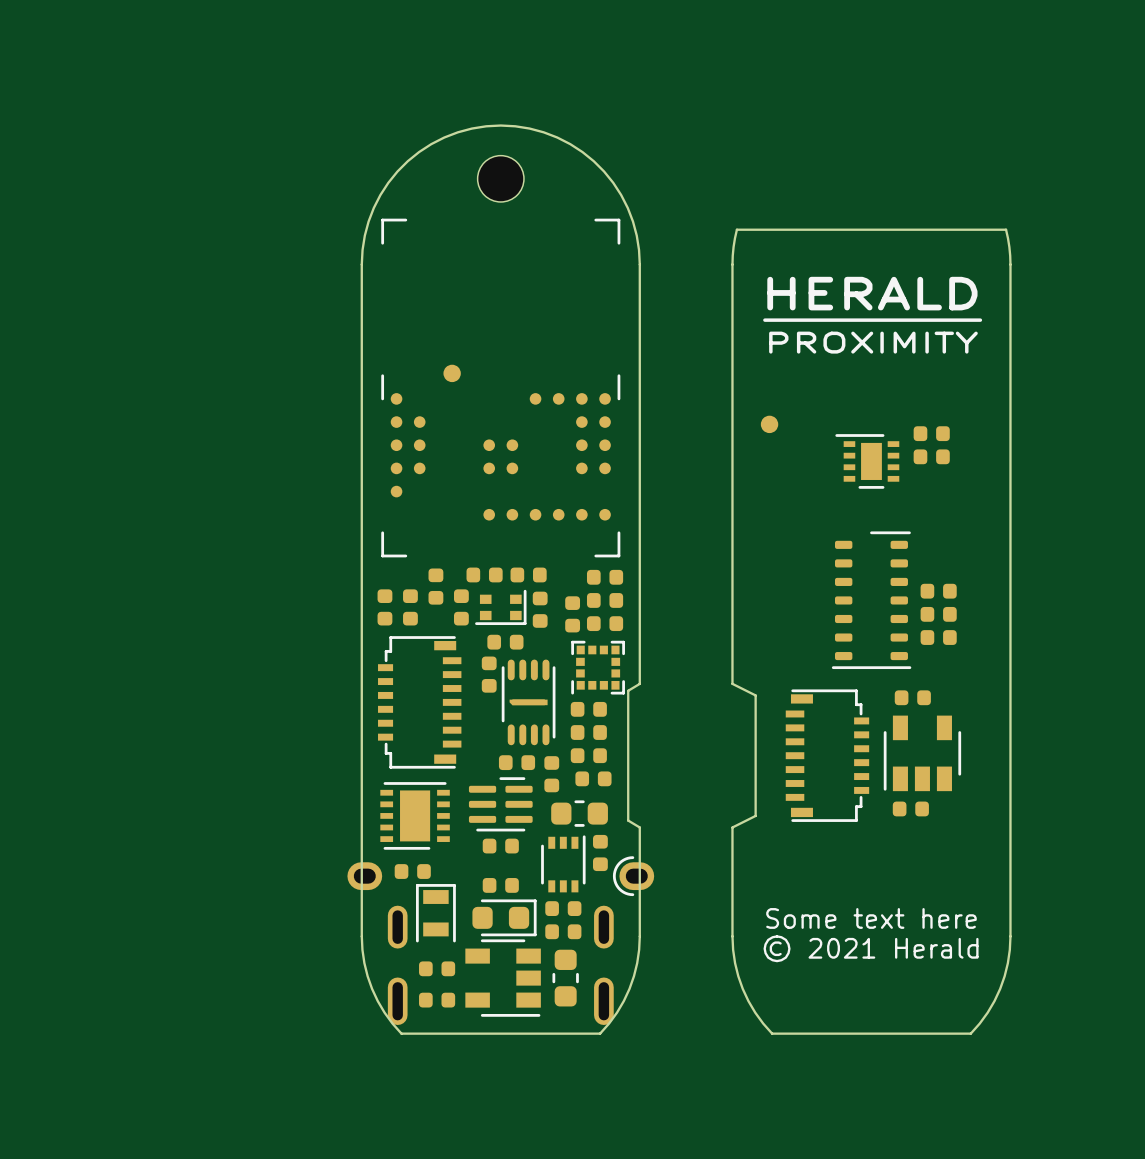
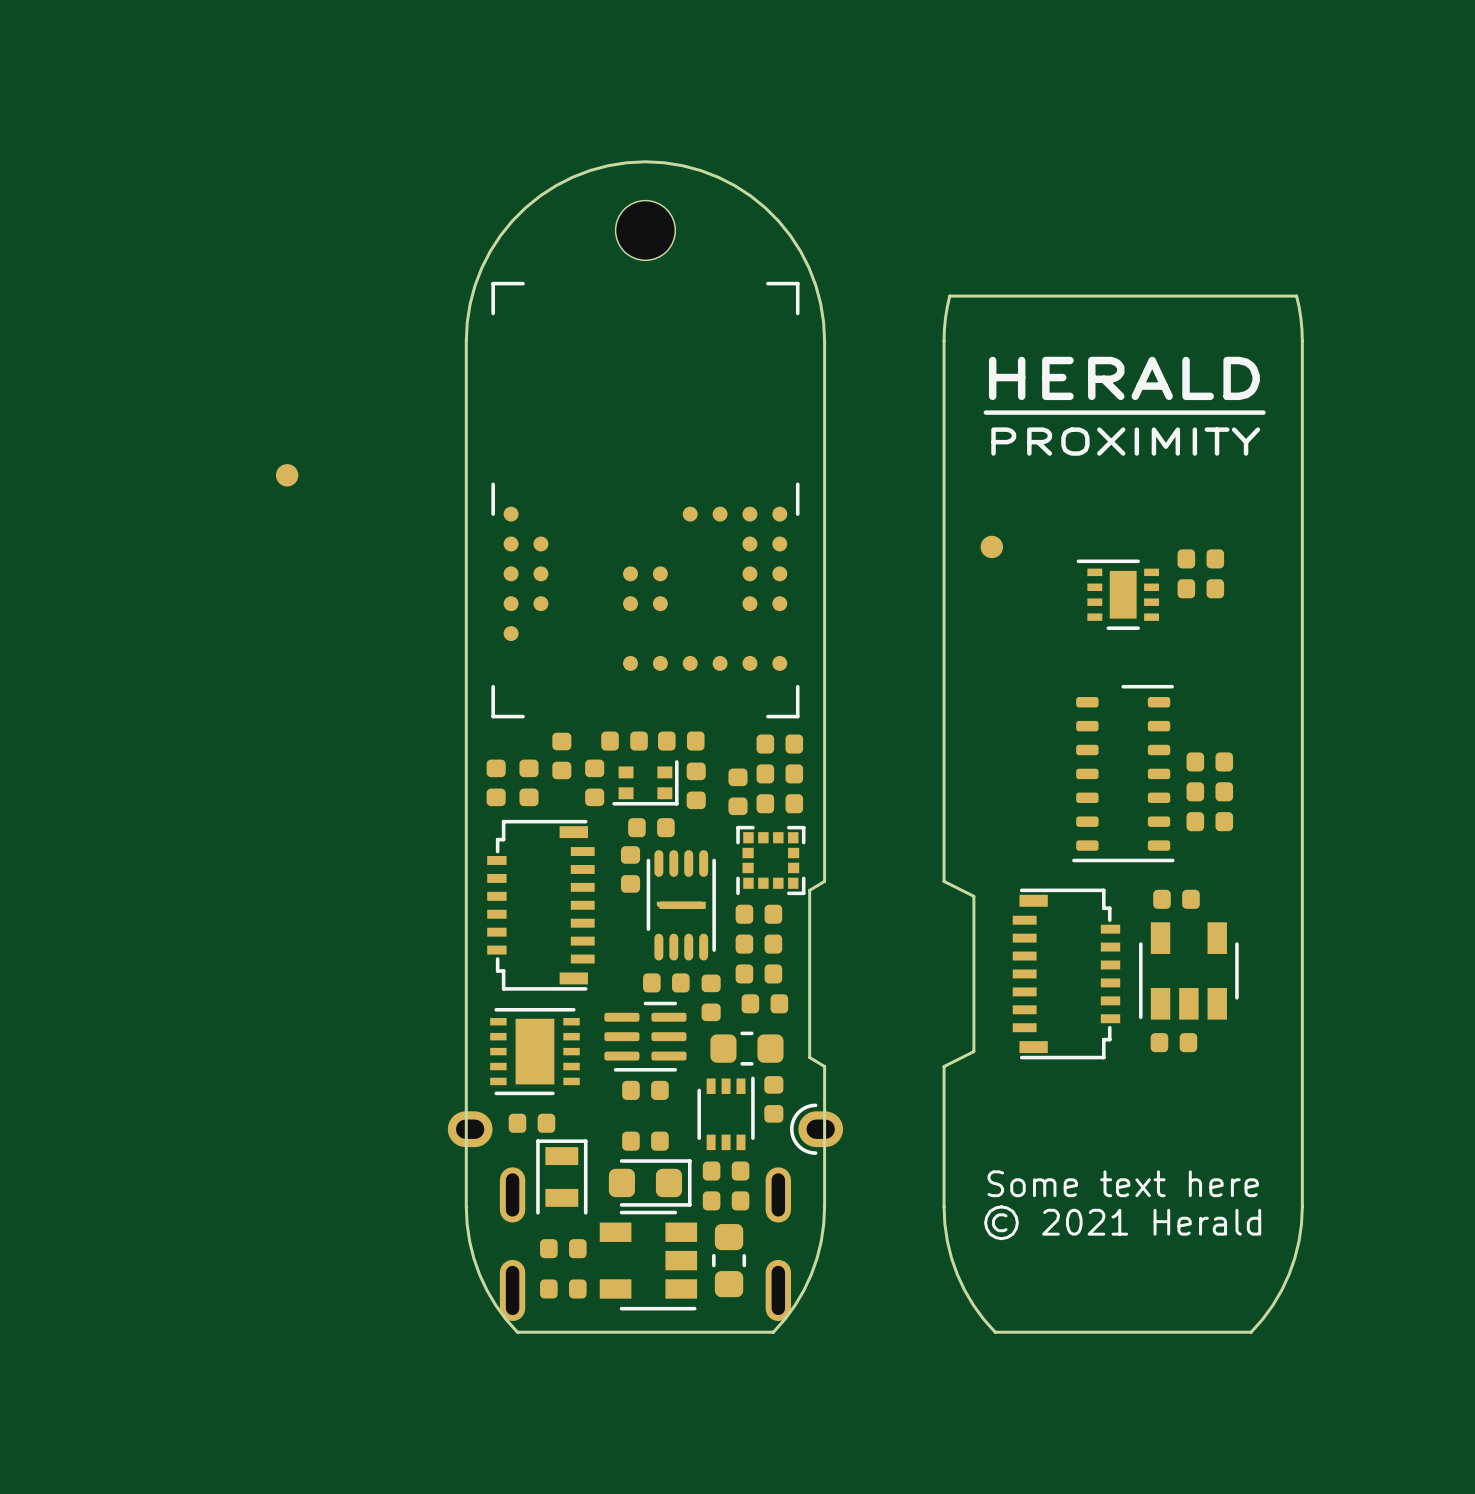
part position: (452, 373) -> (287, 475)

